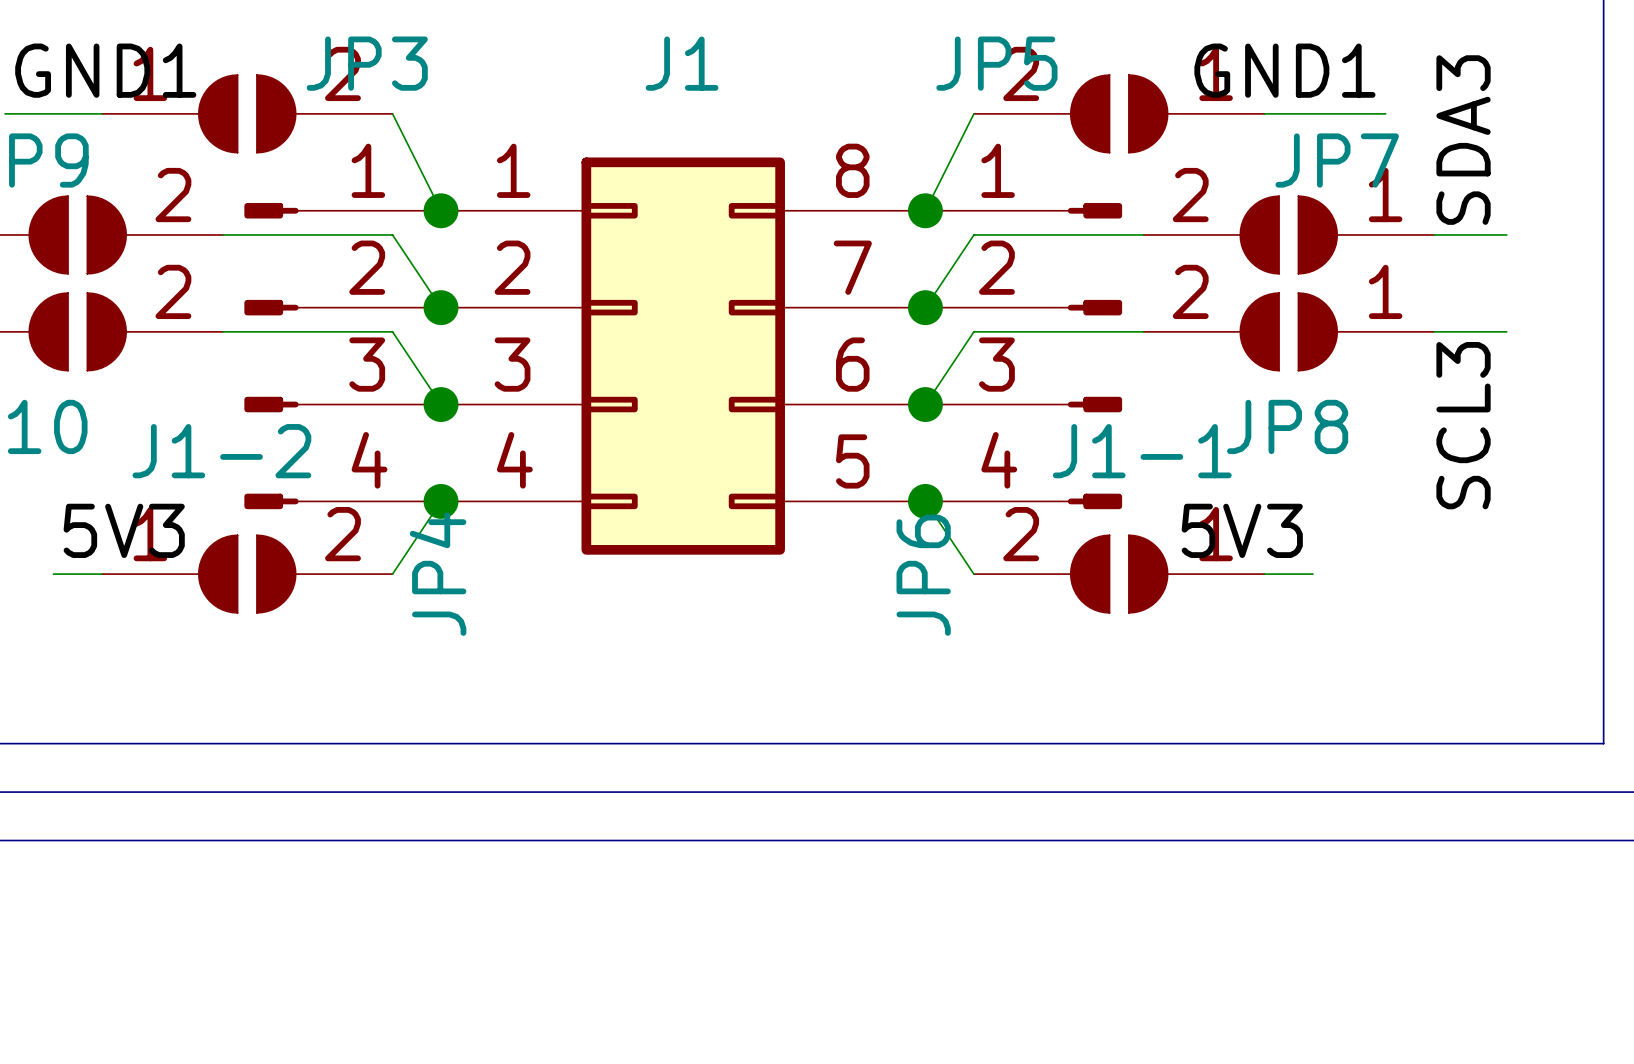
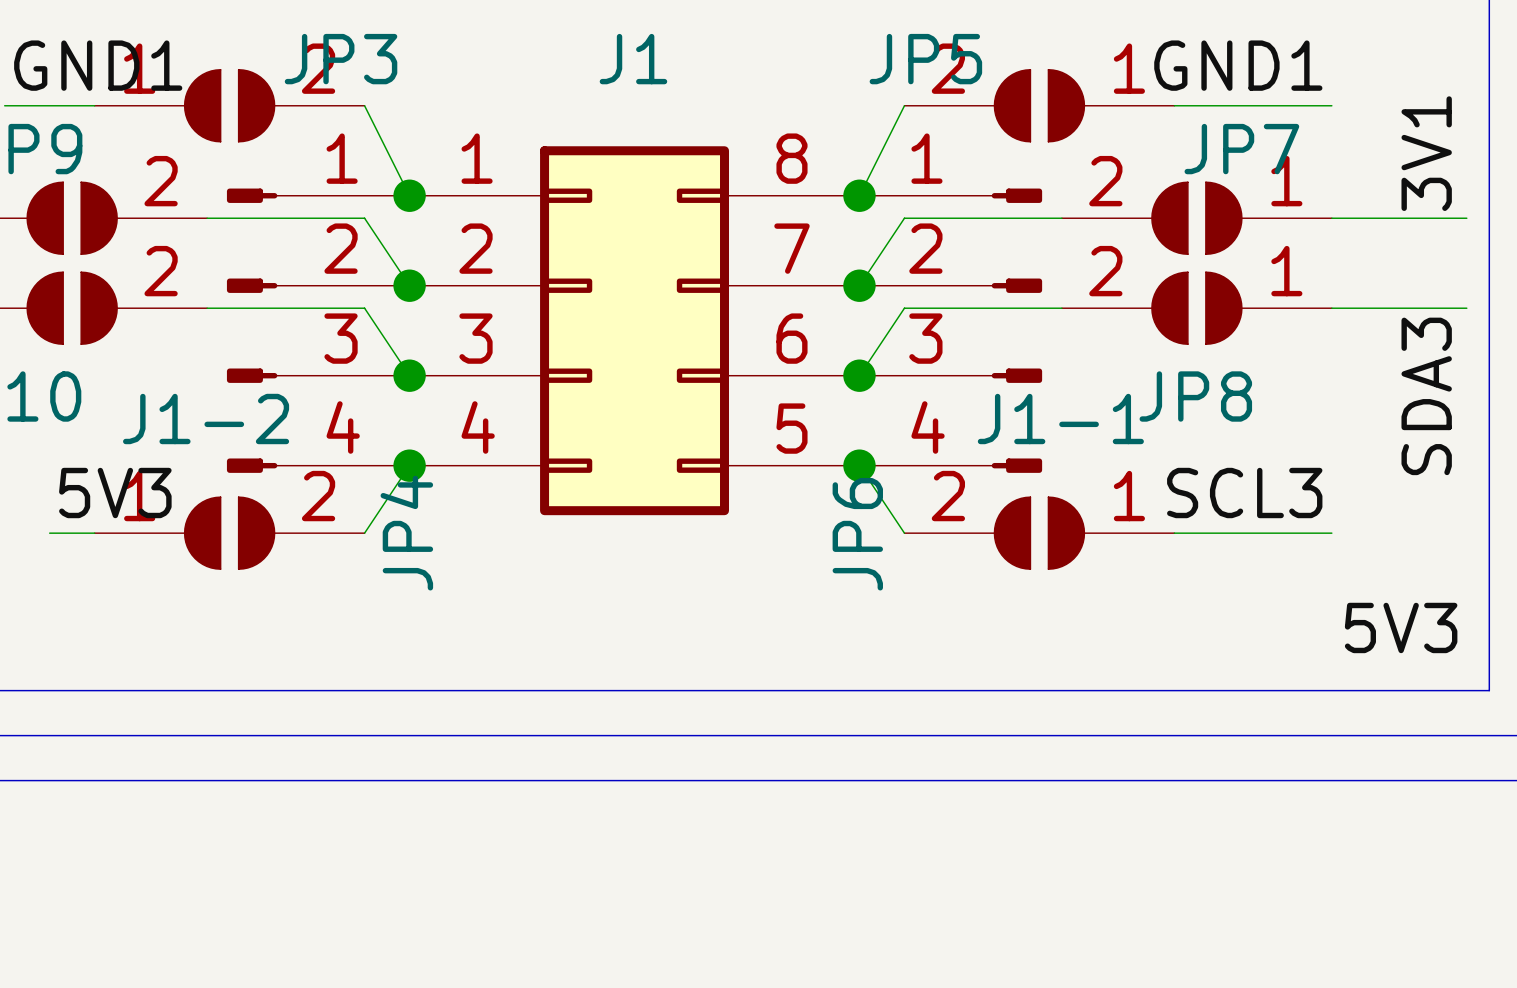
label position: GND1 (1284, 70) -> GND1 (1238, 65)
wire: none -> (1286, 105) (1331, 105)
label position: SDA3 (1463, 140) -> SDA3 (1426, 396)
label: none -> 3V1 (1426, 153)
wire: none -> (1399, 218) (1466, 218)
wire: none -> (1399, 308) (1466, 308)
label rotation: 0° (1463, 425) -> 90° clockwise (1244, 493)
label position: 5V3 (1242, 530) -> 5V3 (1401, 627)
wire: none -> (1219, 533) (1331, 533)

